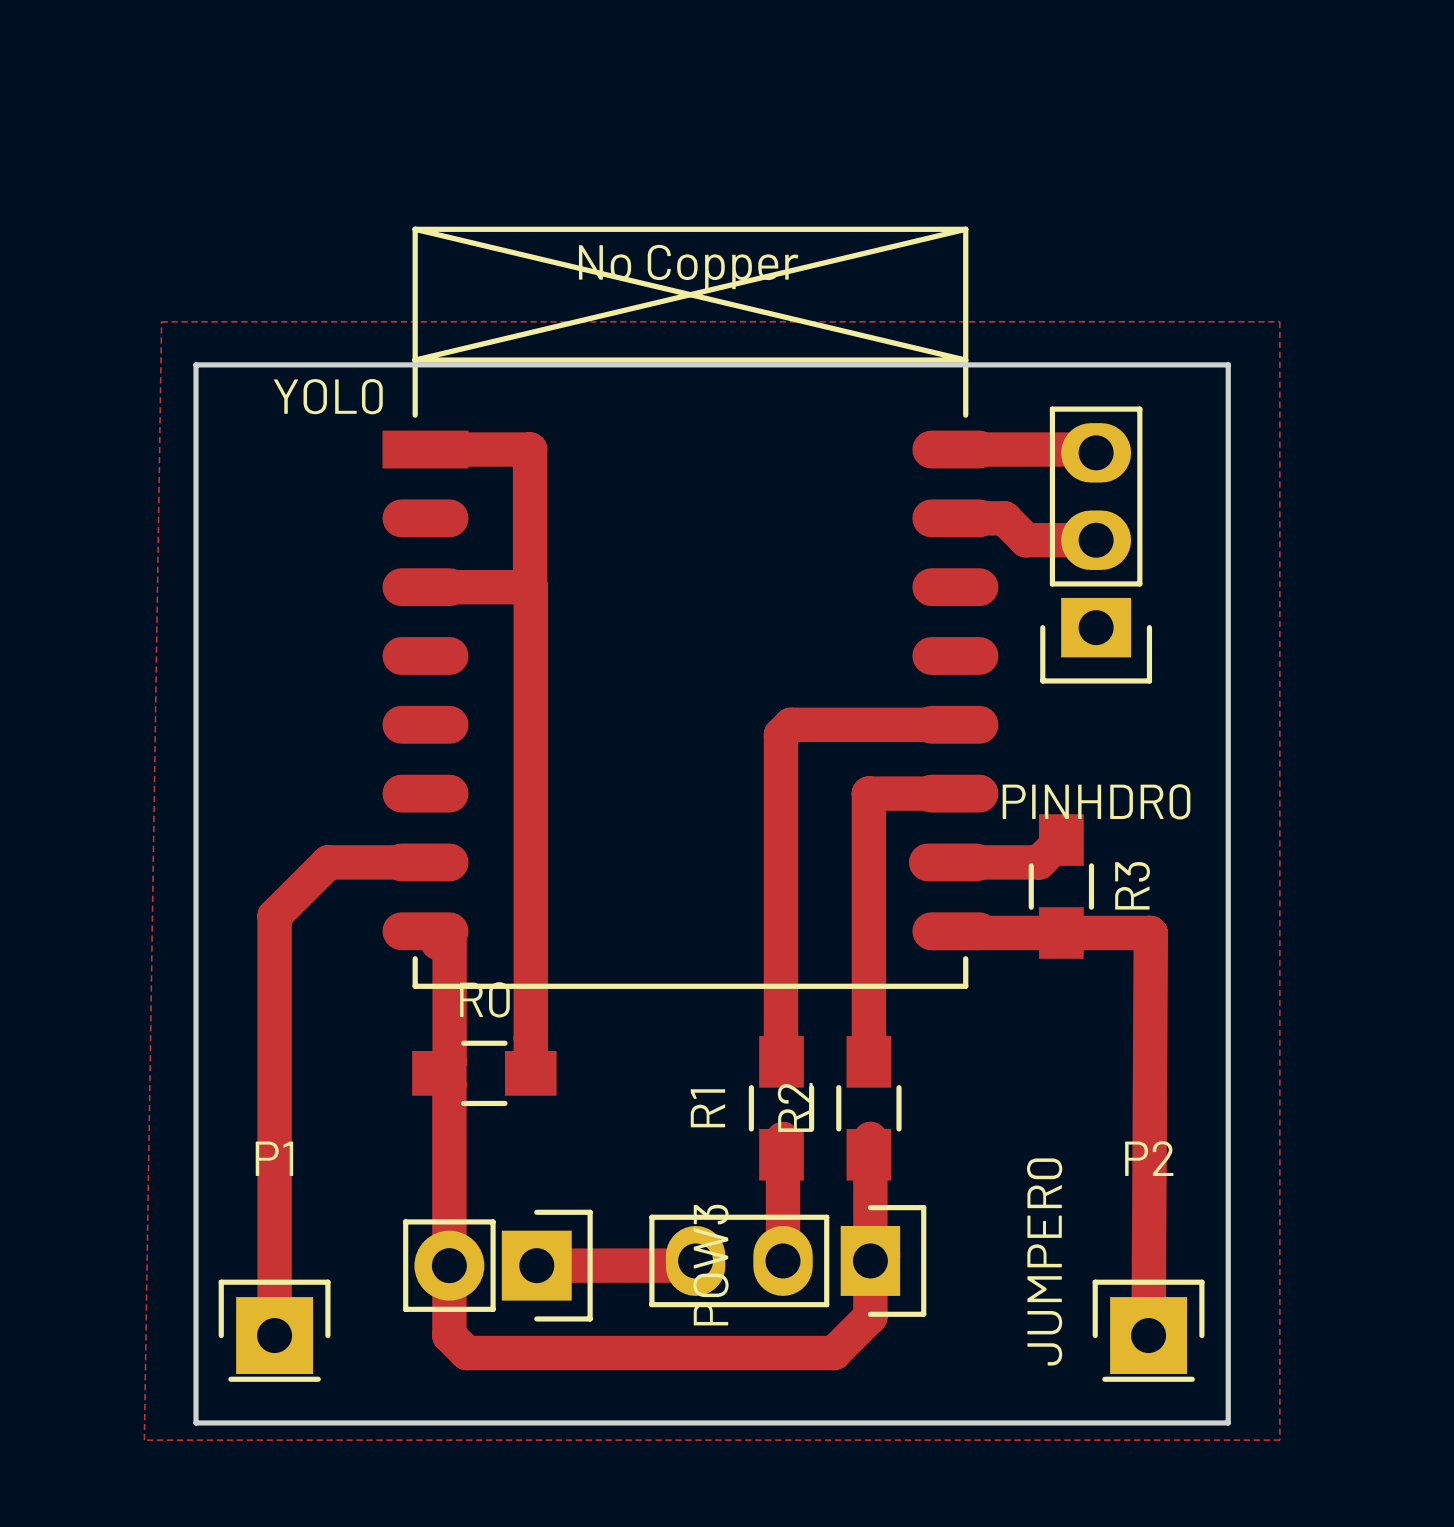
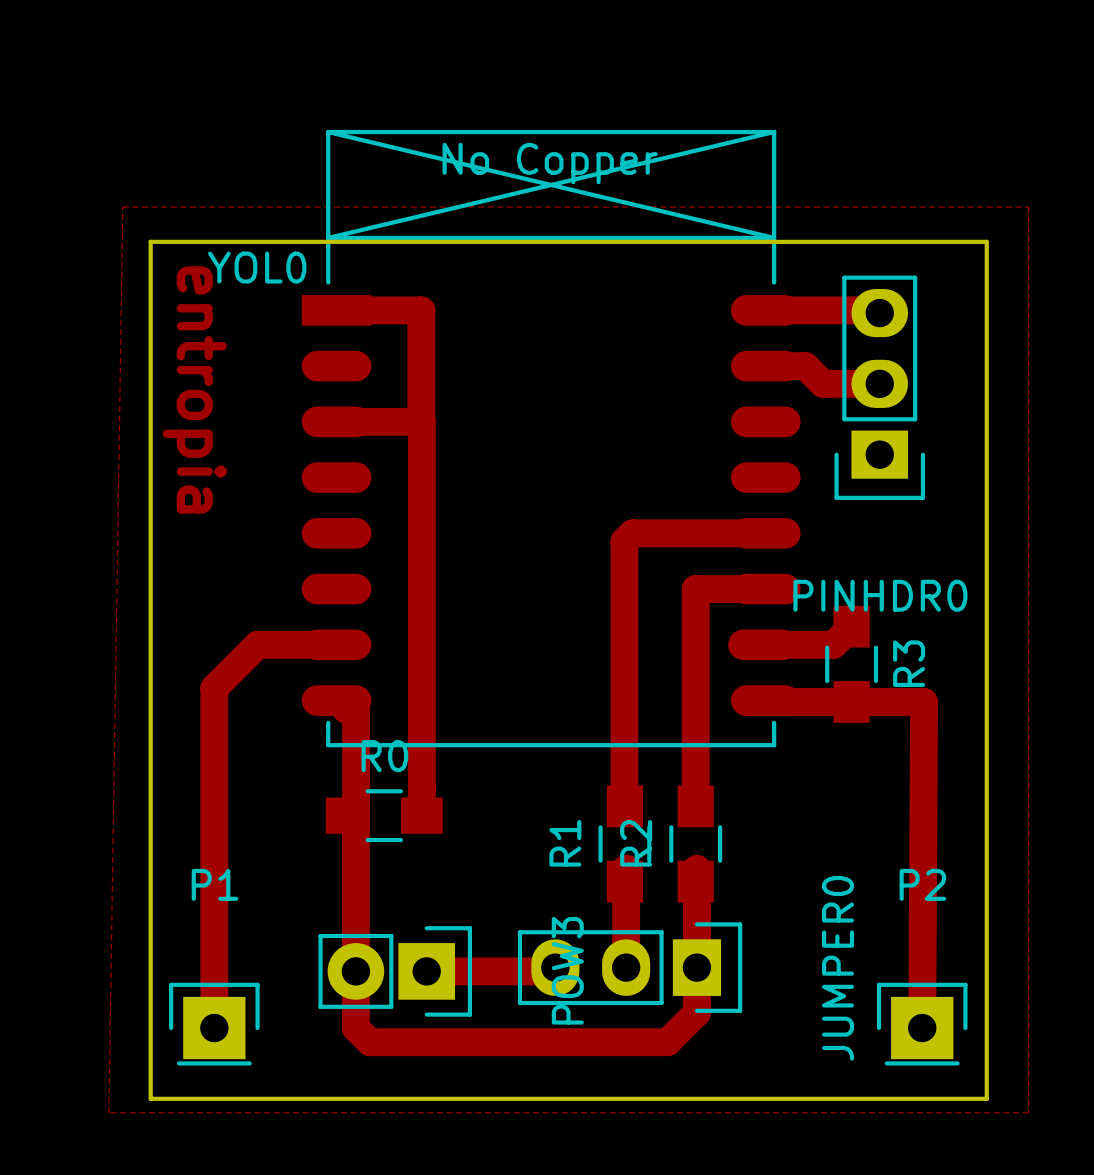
text: none -> entropia (194, 389)

